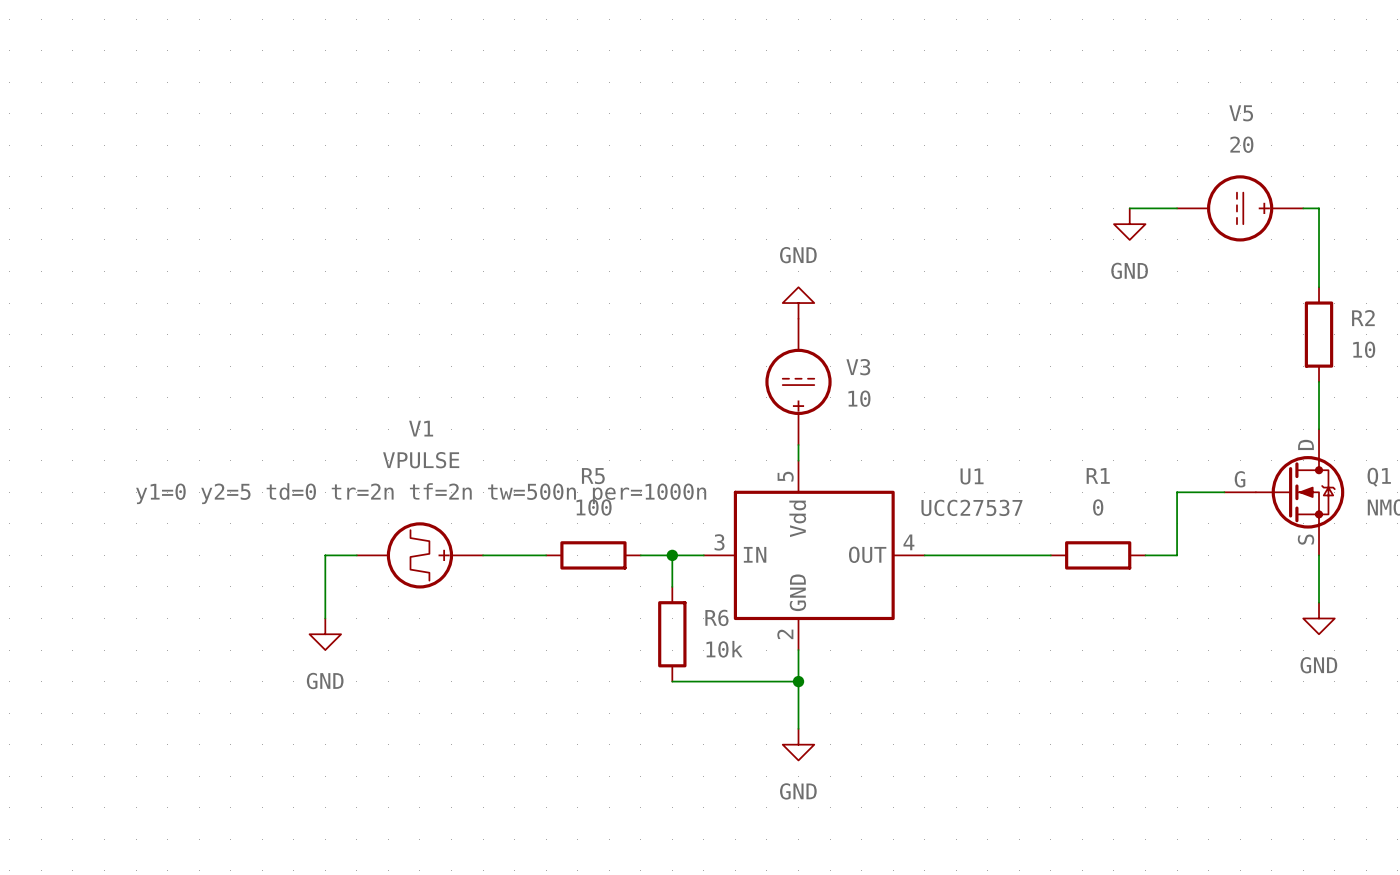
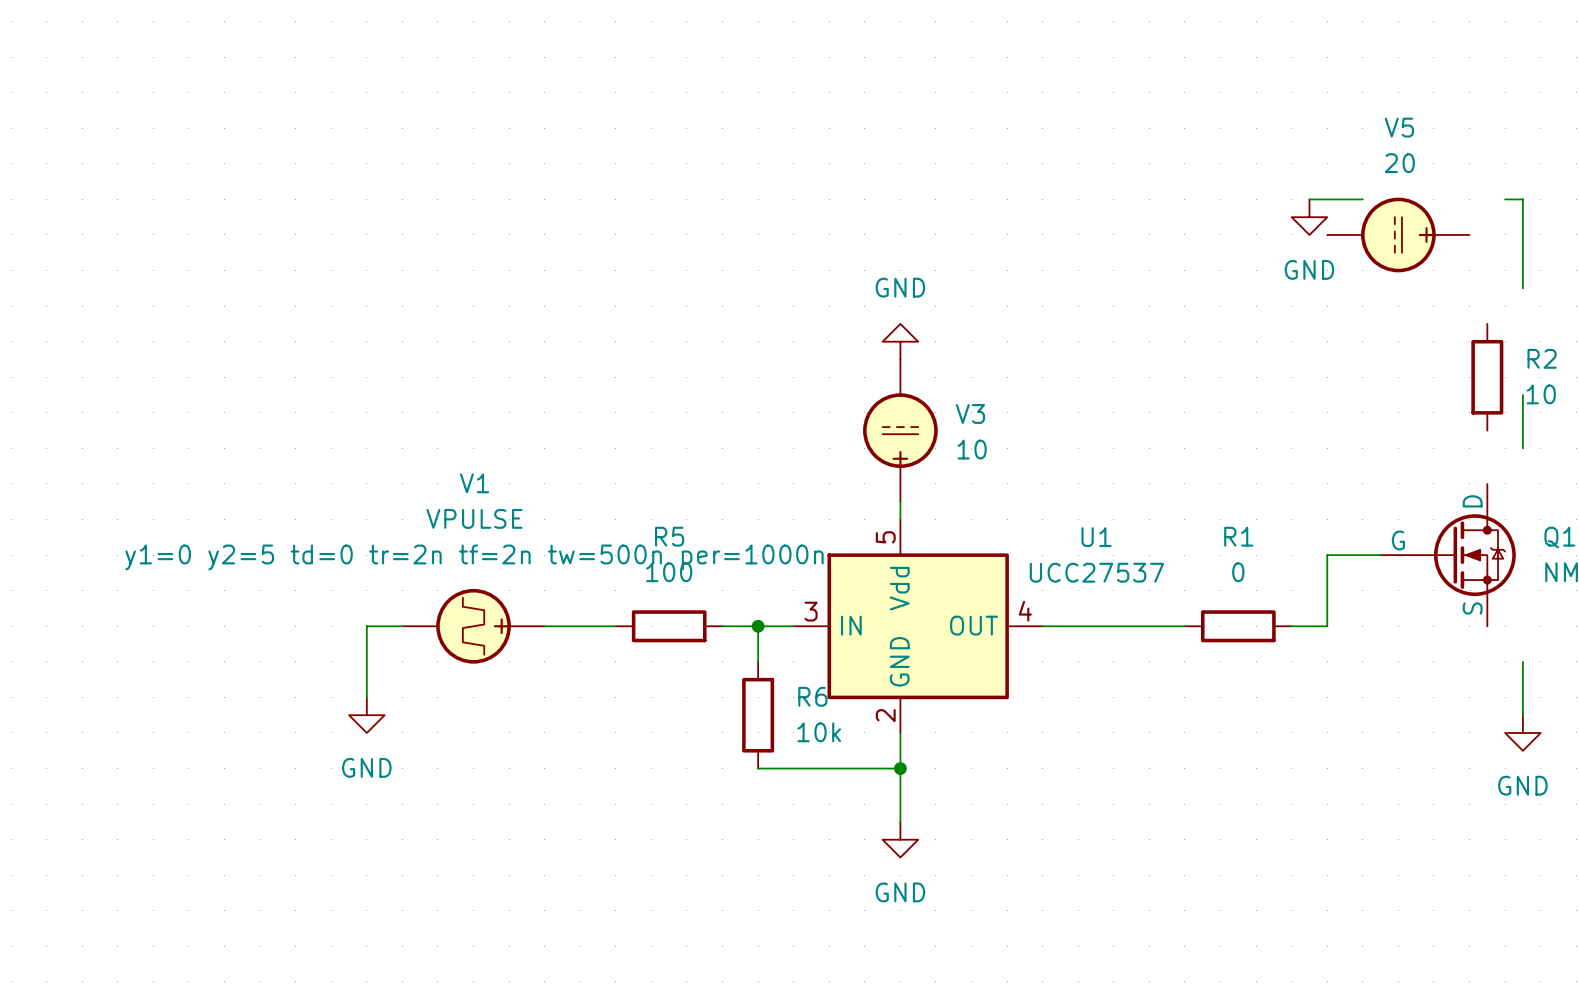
wire: (1129, 208) (1177, 208) -> (1309, 199) (1362, 199)
wire: (1303, 208) (1319, 208) (1319, 287) -> (1505, 199) (1522, 199) (1522, 288)
power symbol position: GND (1129, 224) -> GND (1309, 217)
wire: (1319, 381) (1319, 429) -> (1522, 395) (1522, 448)
wire: (1319, 555) (1319, 602) -> (1522, 661) (1522, 715)
power symbol position: GND (1319, 618) -> GND (1522, 732)

